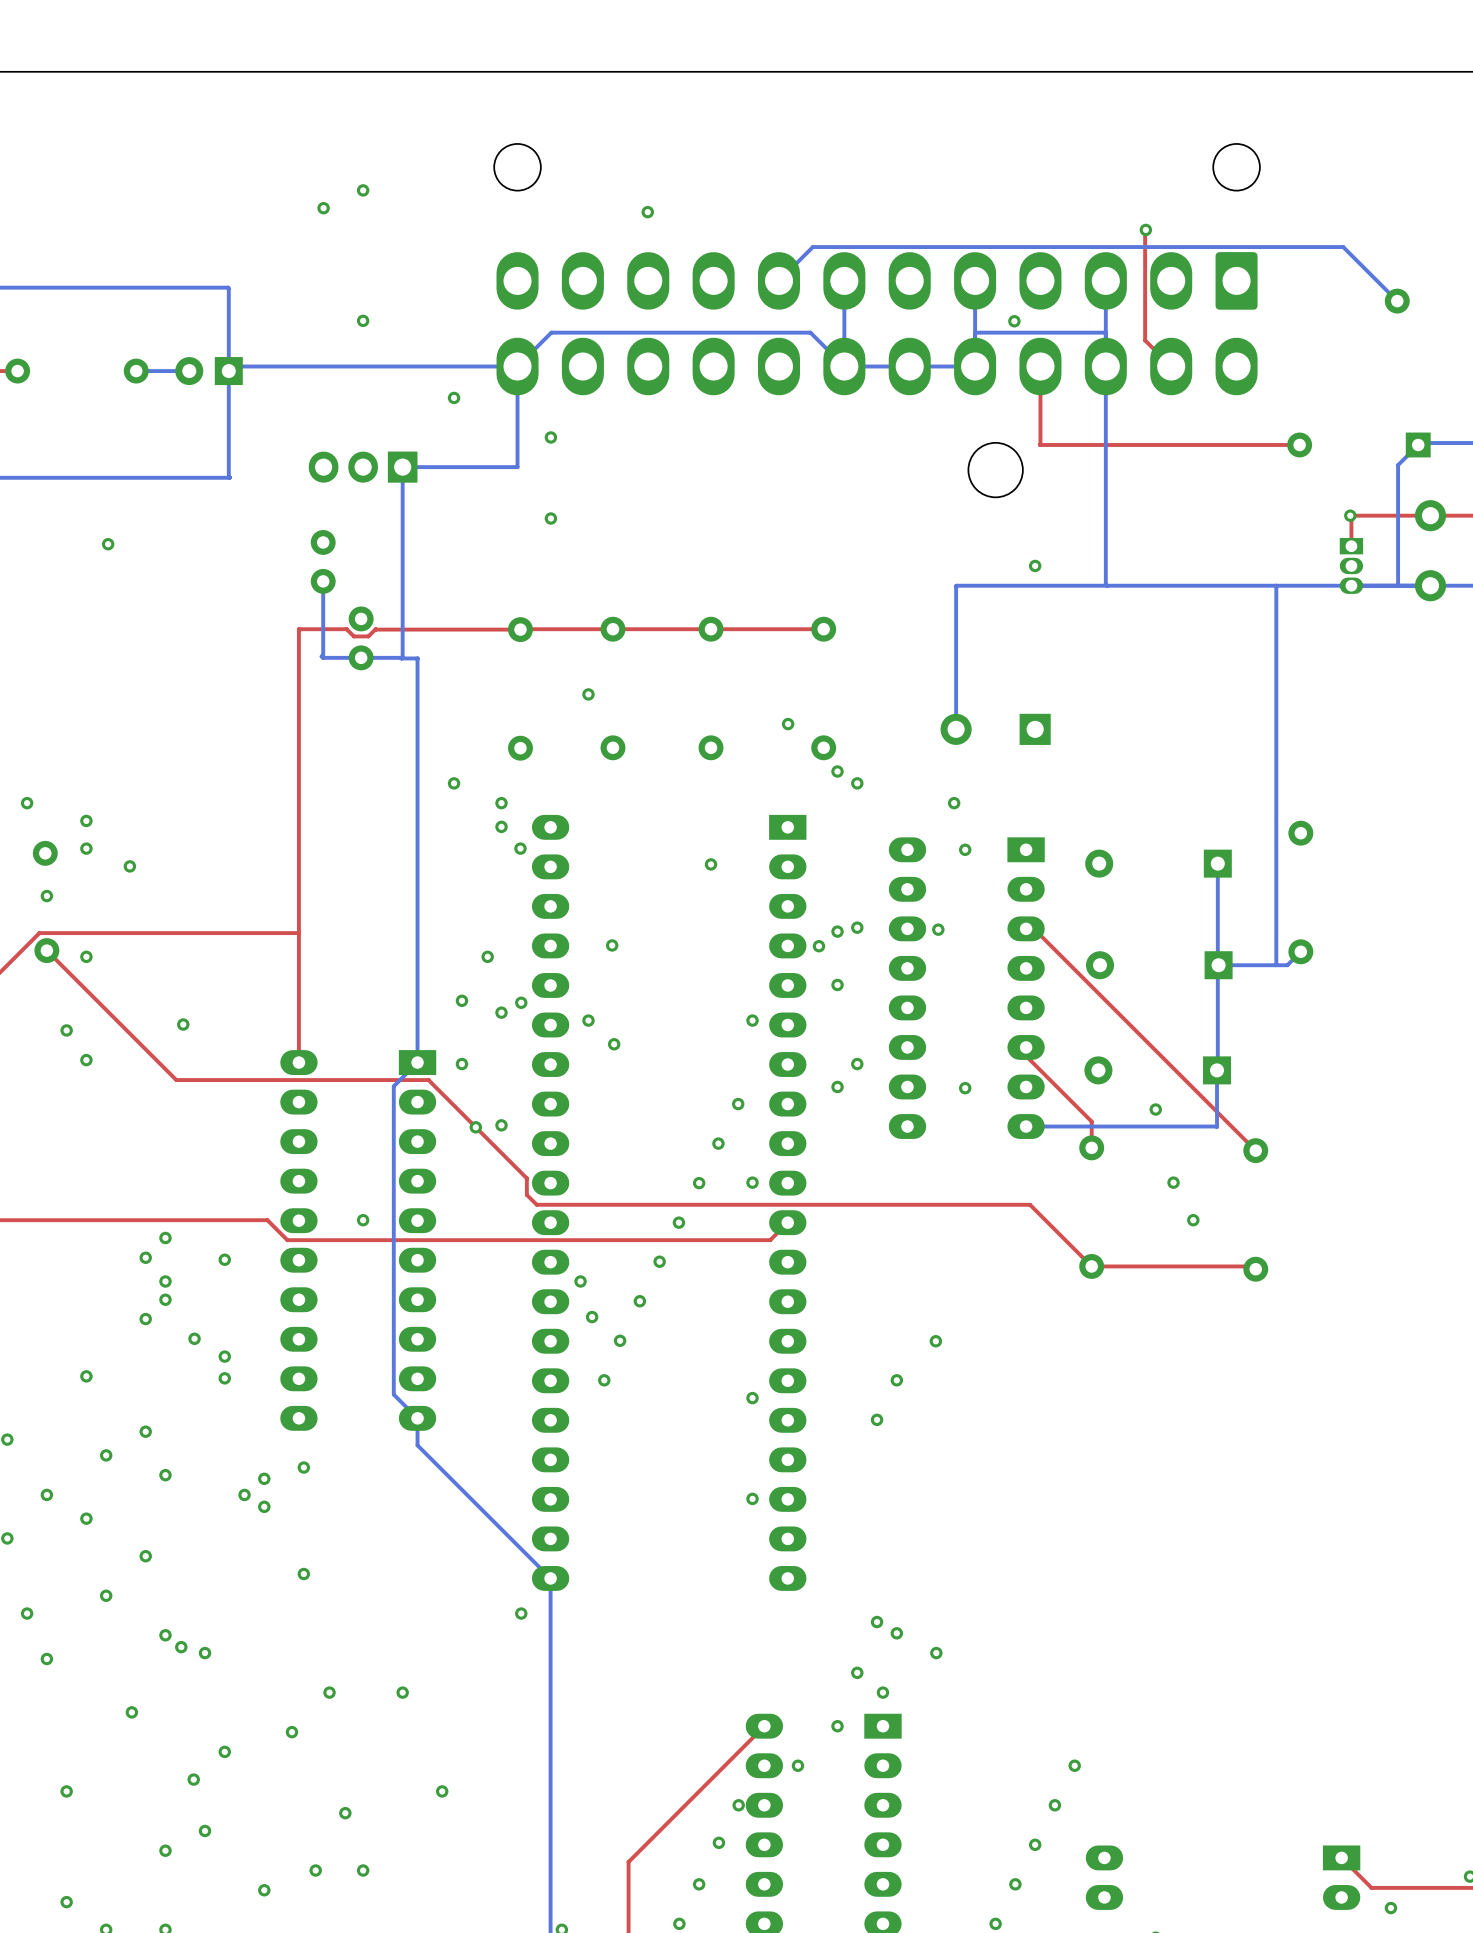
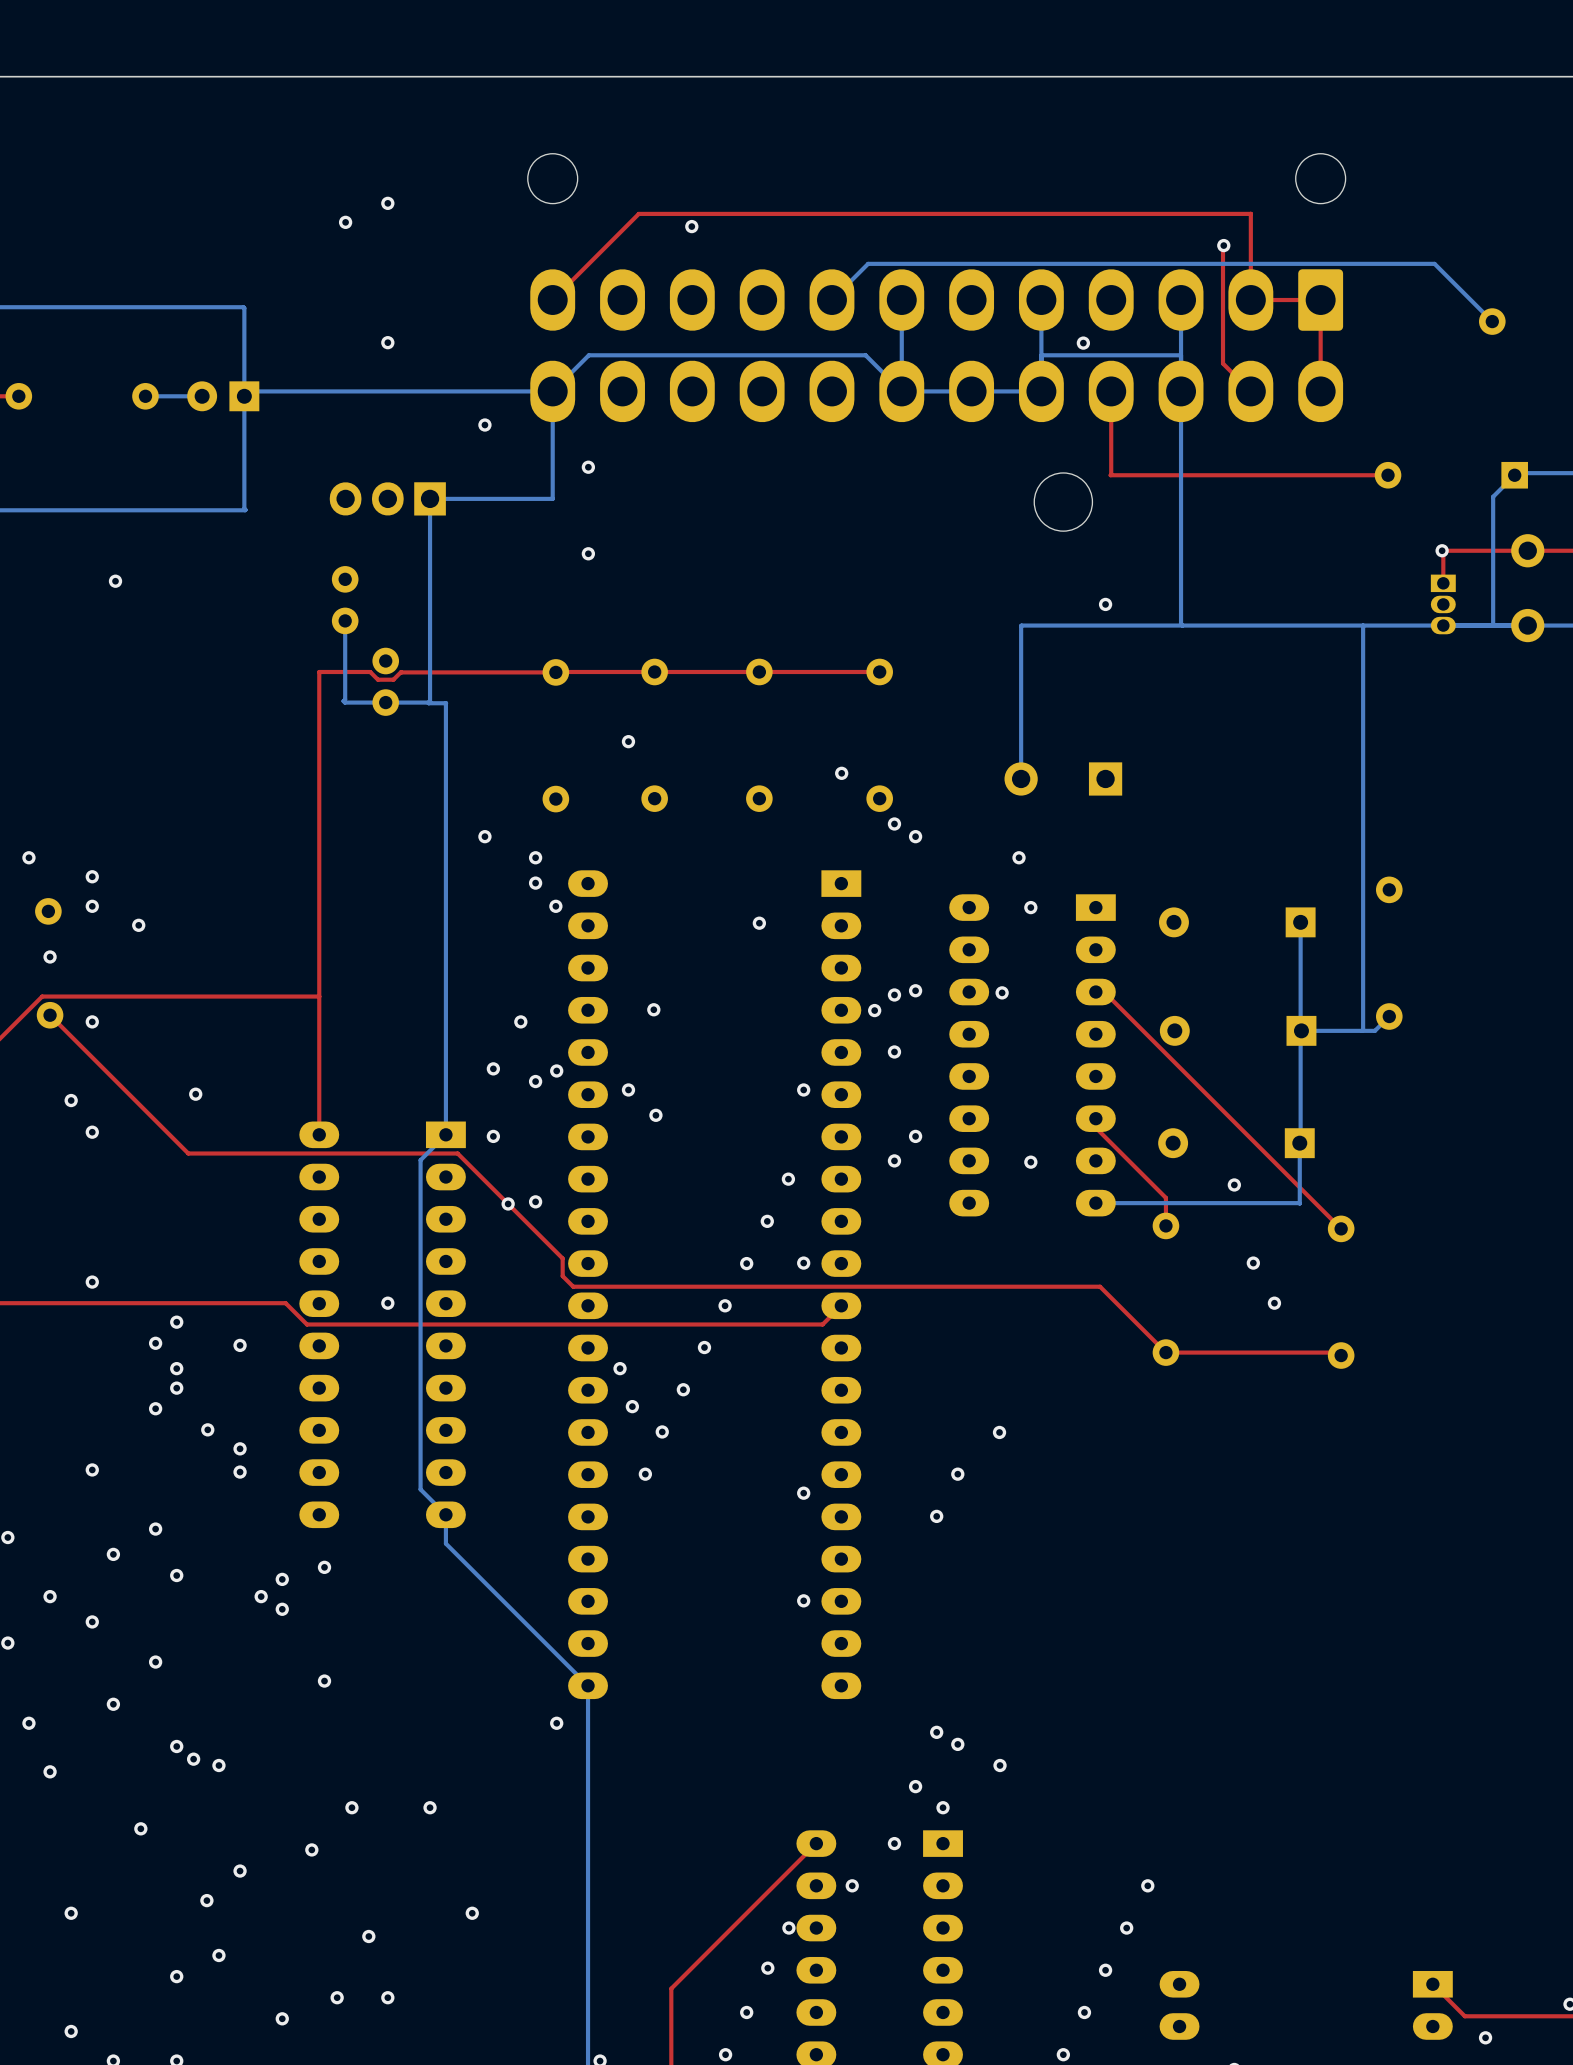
top track: none -> (1250, 213) (1250, 300) (1320, 300) (1320, 391)
top track: none -> (1250, 213) (638, 213) (552, 300)
via: none -> (92, 1282)

